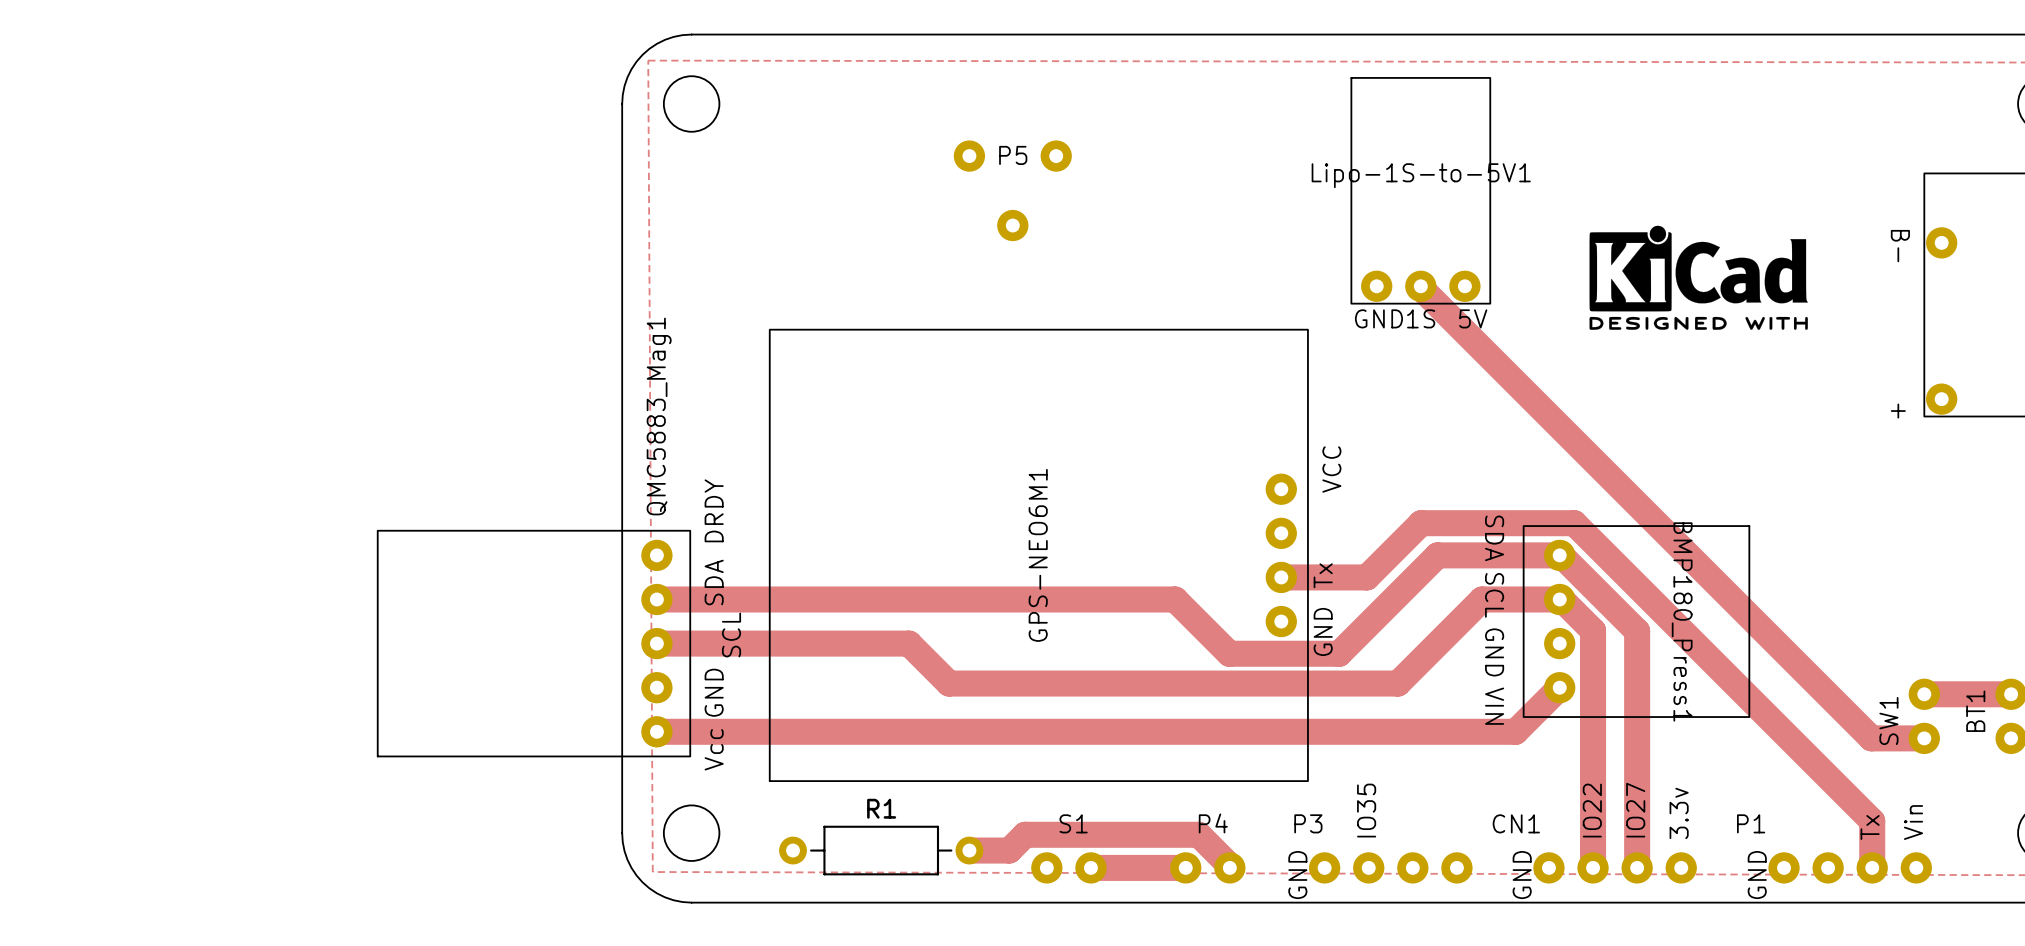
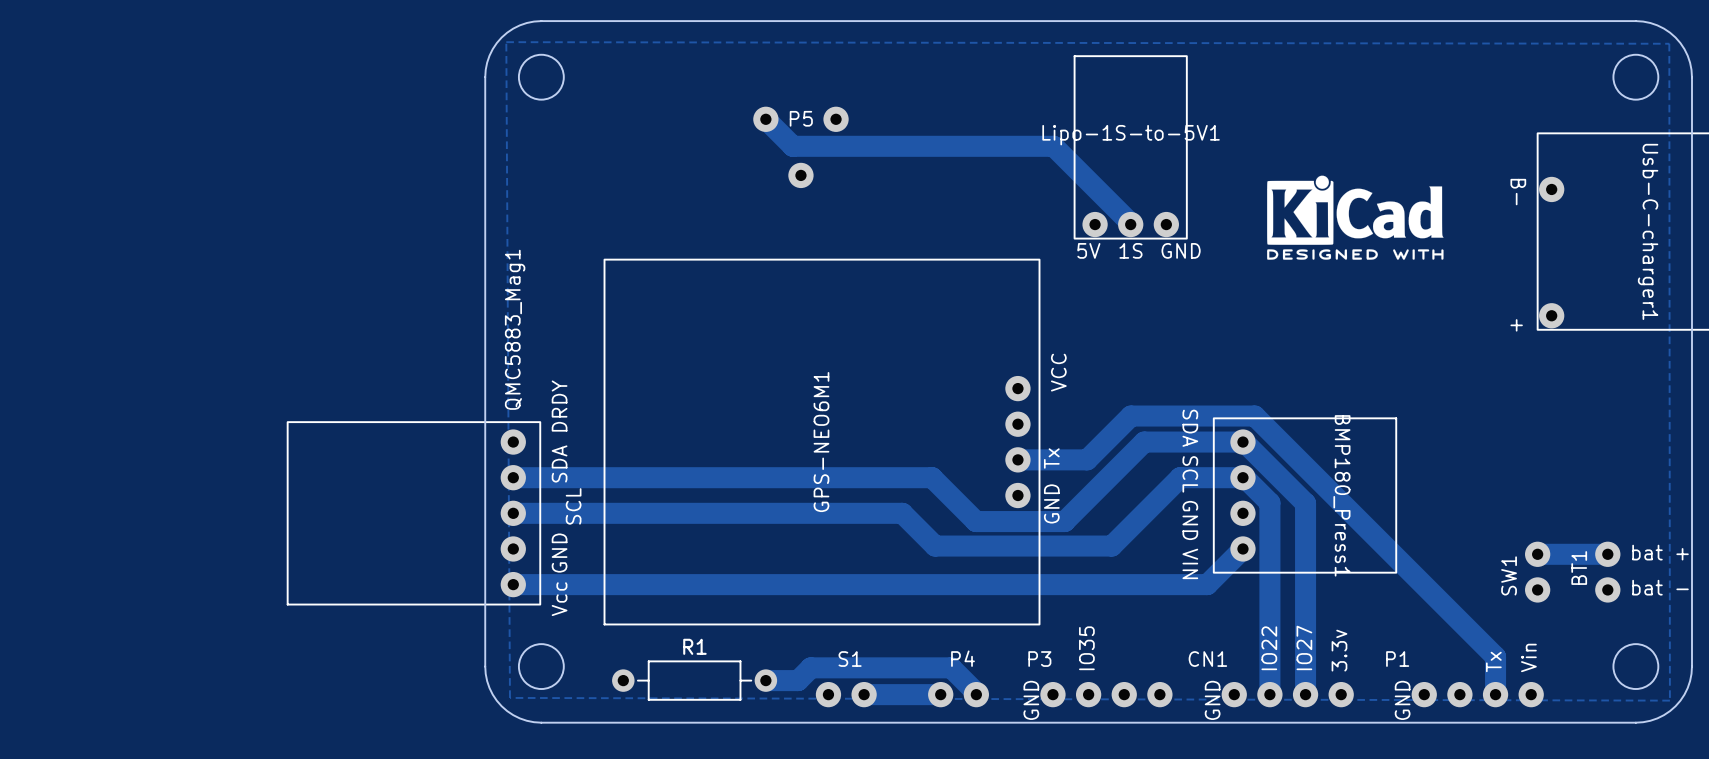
track: (1420, 286) (1871, 738) (1924, 738) -> (1130, 224) (1053, 146) (792, 146) (765, 119)
Lipo-1S-to-5V1 text: GND (1378, 318) -> 5V (1088, 250)
Lipo-1S-to-5V1 text: 5V (1473, 318) -> GND (1181, 250)
track: (909, 643) (949, 683) (1397, 683) -> (717, 513) (902, 513) (935, 546) (1112, 545)

